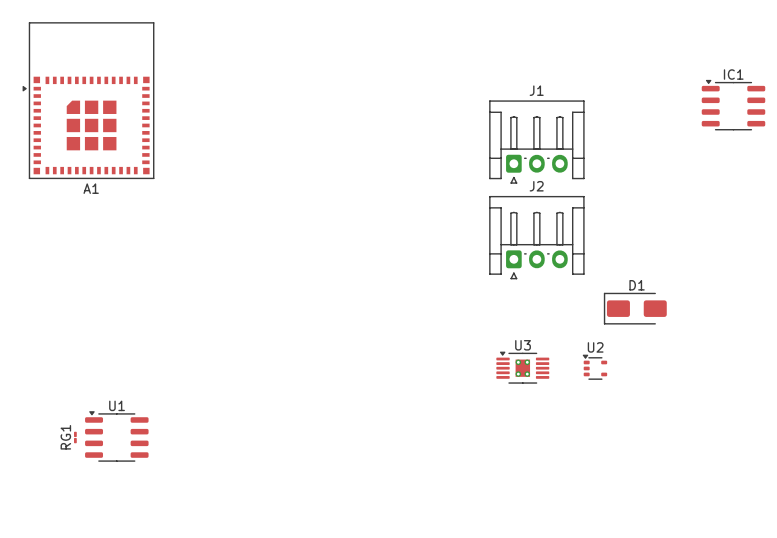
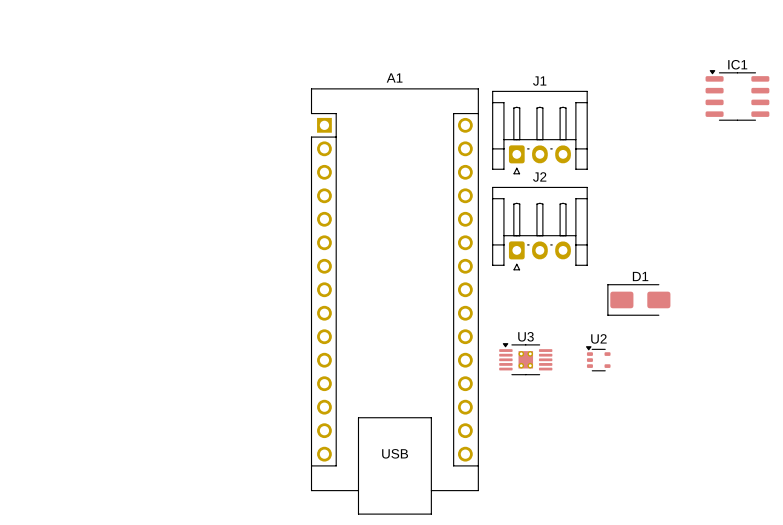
A1 footprint: [22, 22, 155, 179] -> [310, 88, 479, 515]
A1 name position: A1 (91, 188) -> A1 (394, 78)
U1: (116, 436) -> none
RG1: (75, 437) -> none

